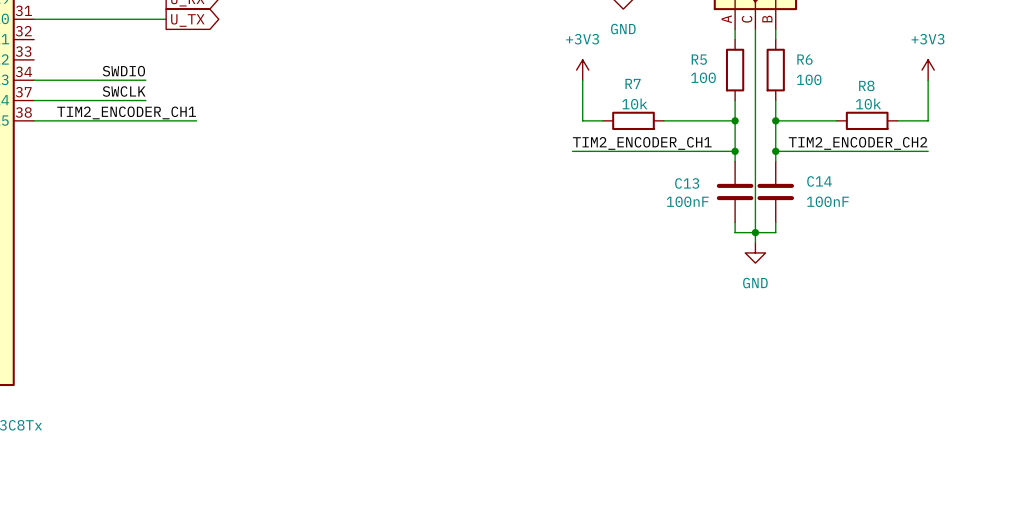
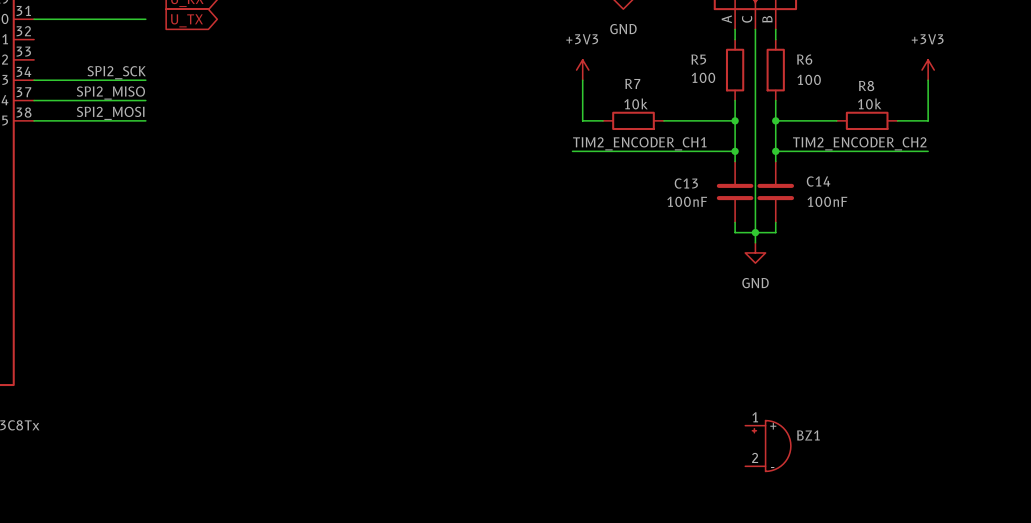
wire: (145, 19) (166, 19) -> none
label: SWDIO (123, 71) -> SPI2_SCK (116, 72)
label: SWCLK (124, 91) -> SPI2_MISO (110, 93)
label: none -> SPI2_MOSI (110, 113)
label: TIM2_ENCODER_CH1 (126, 112) -> none
wire: (145, 120) (196, 120) -> none
BZ1: none -> (768, 445)

